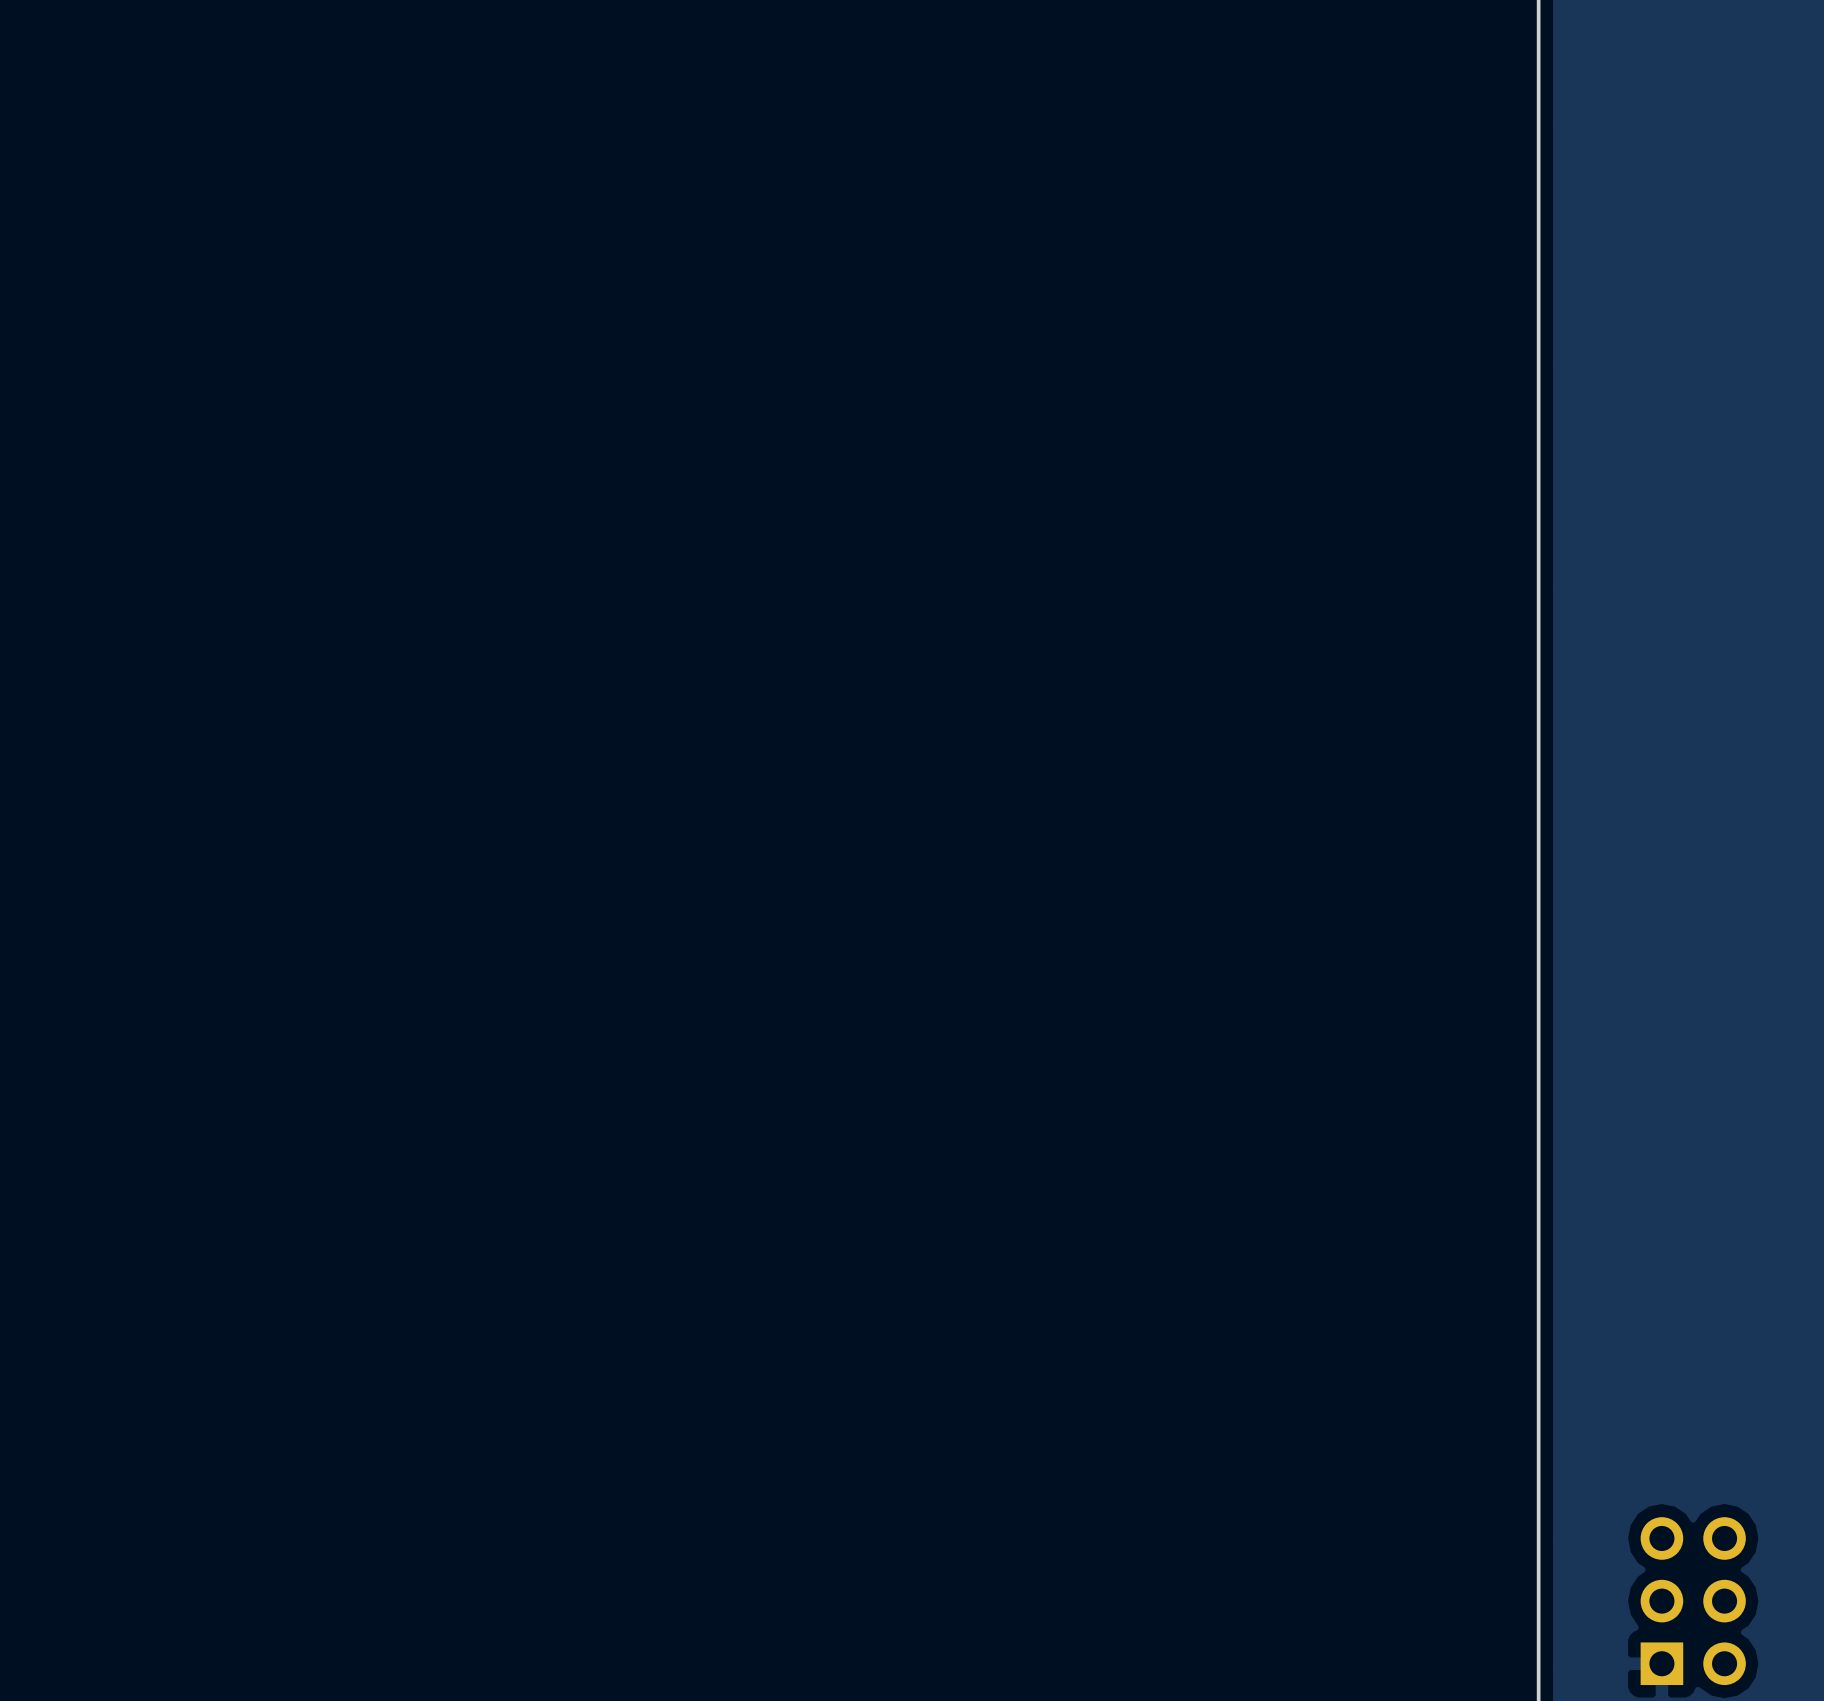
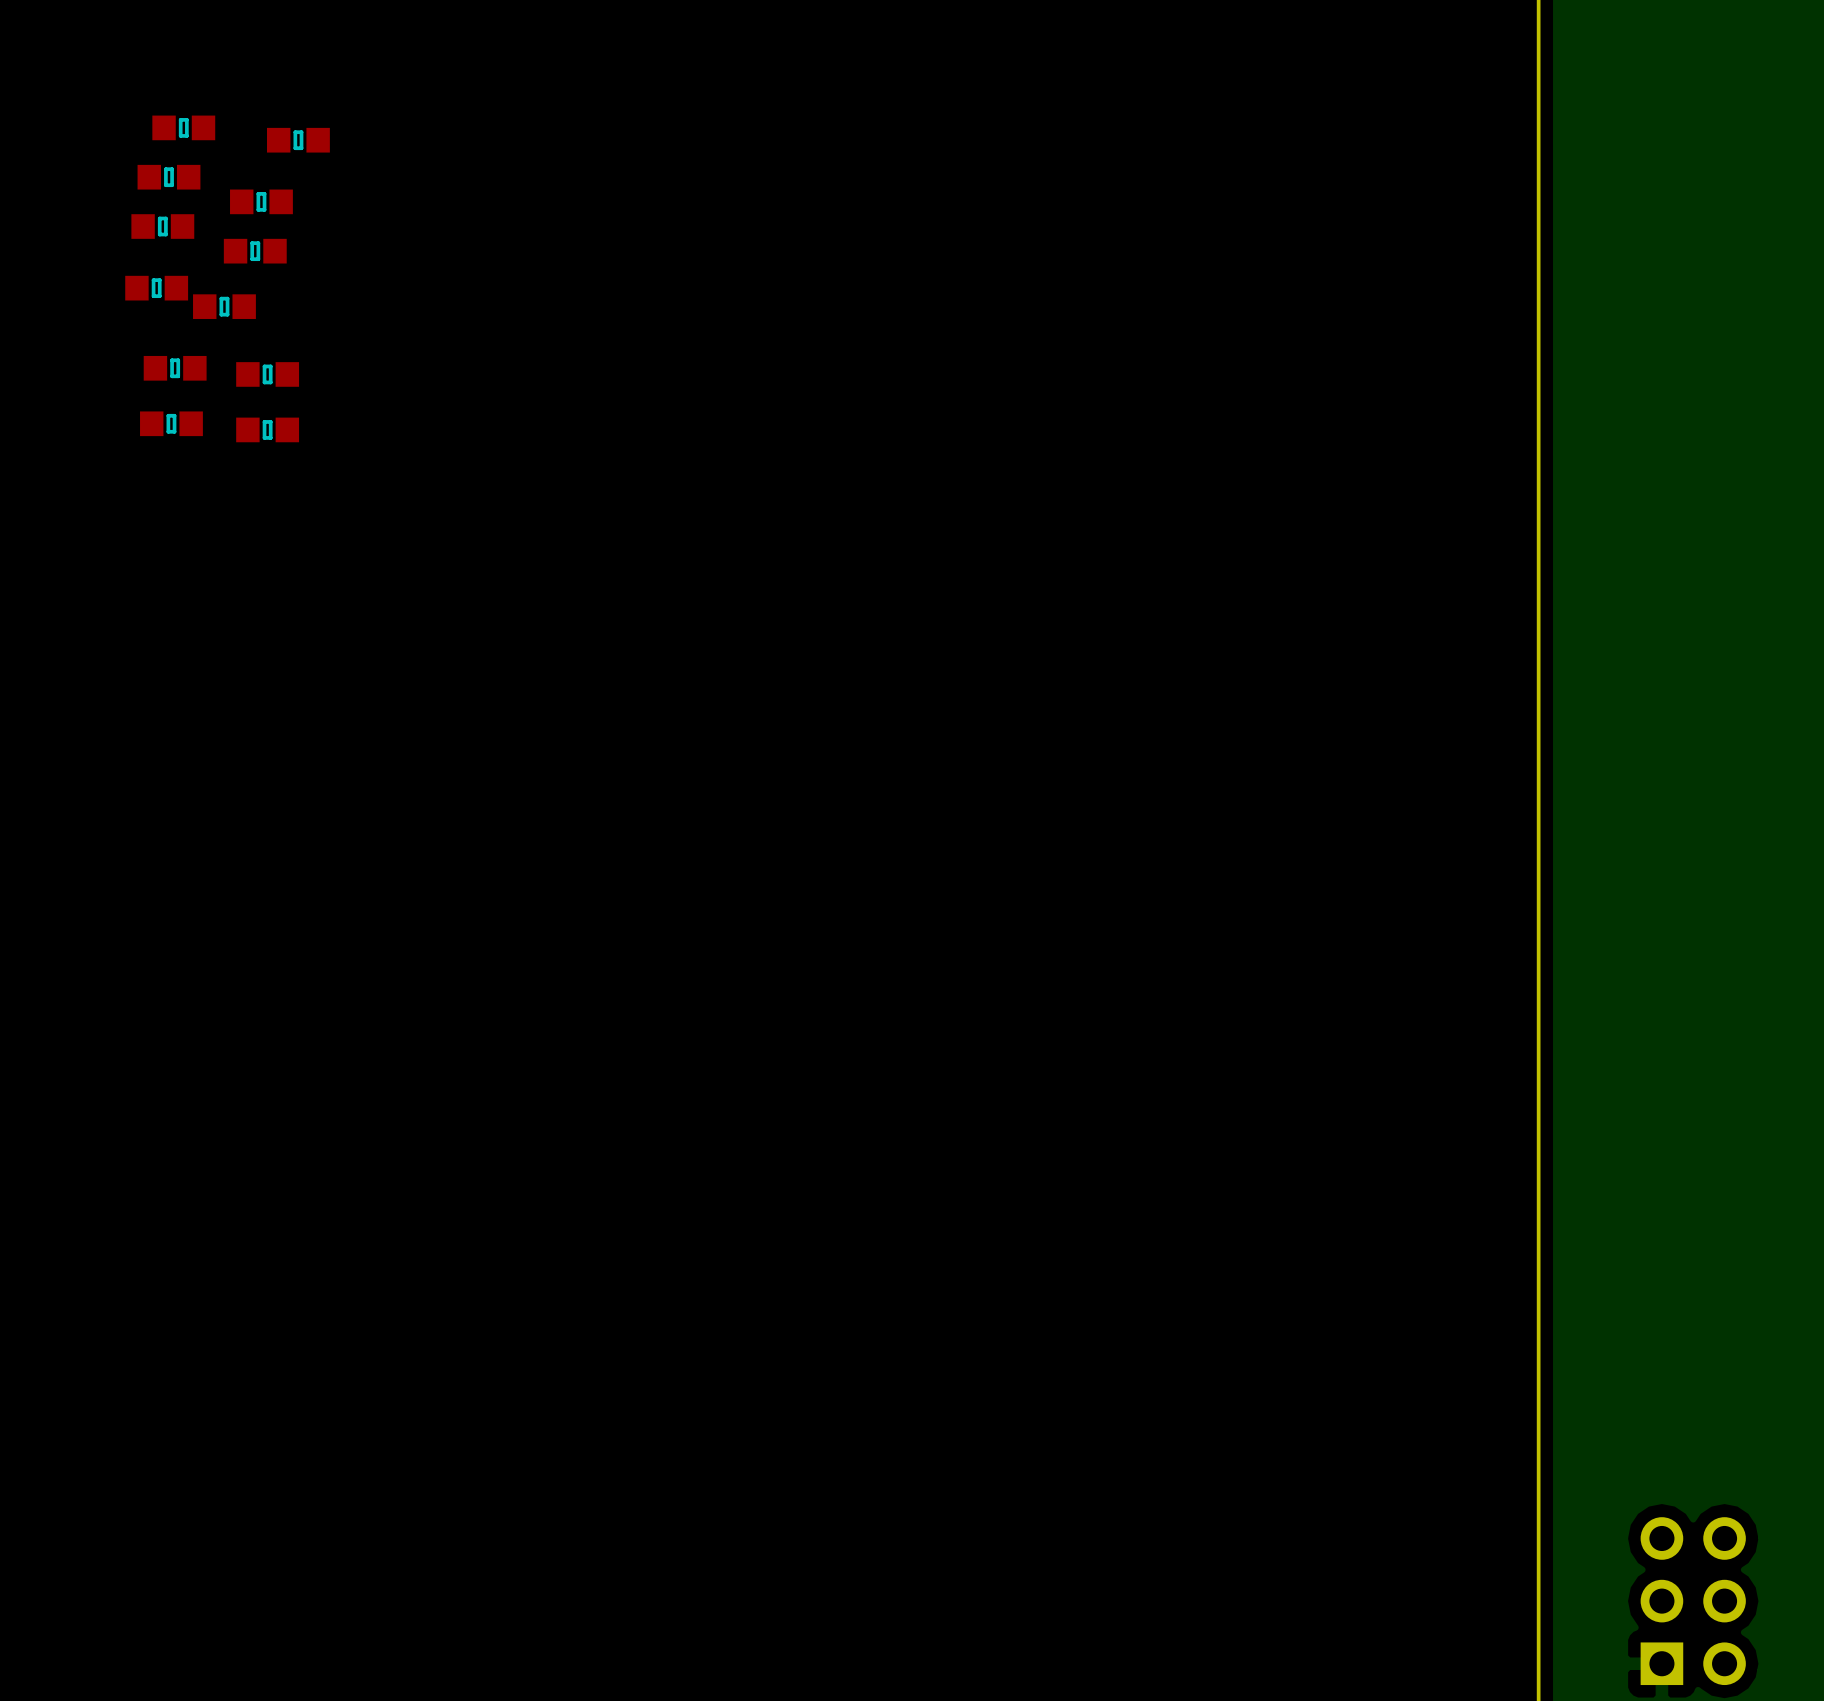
part: none -> (183, 127)
part: none -> (298, 140)
part: none -> (168, 177)
part: none -> (261, 201)
part: none -> (162, 226)
part: none -> (255, 251)
part: none -> (156, 288)
part: none -> (224, 306)
part: none -> (175, 368)
part: none -> (267, 374)
part: none -> (171, 423)
part: none -> (267, 429)

